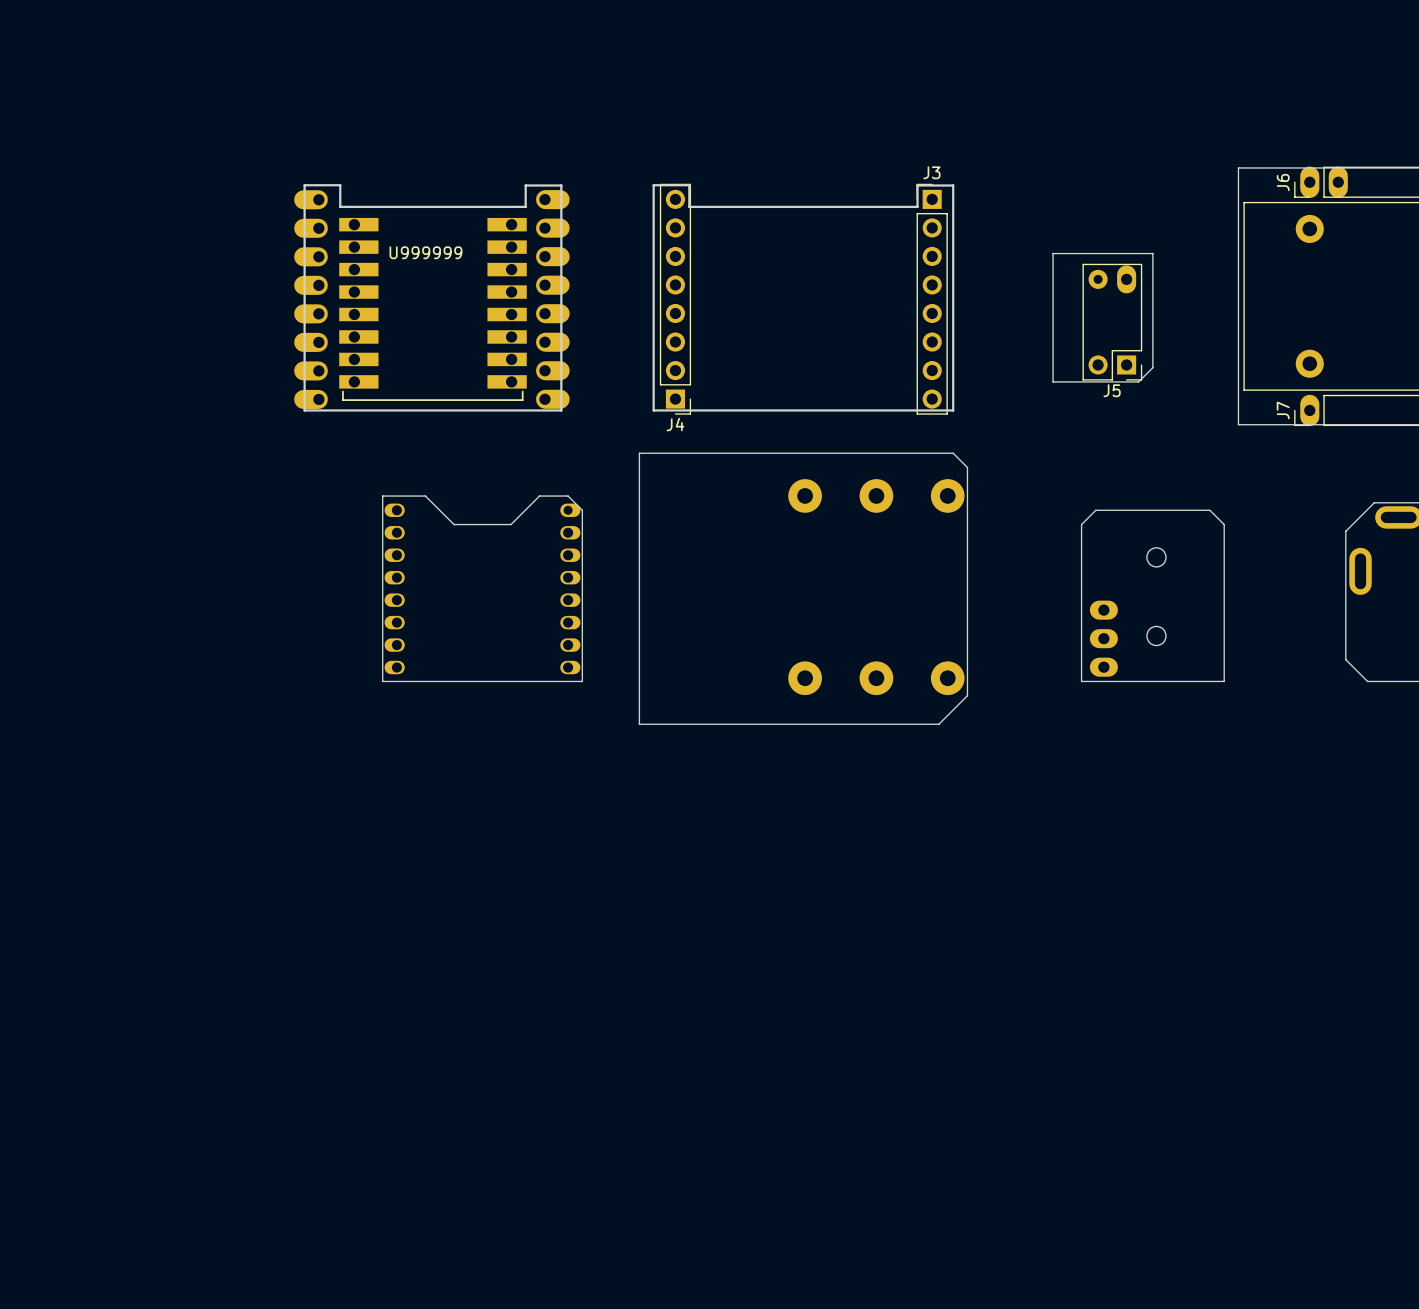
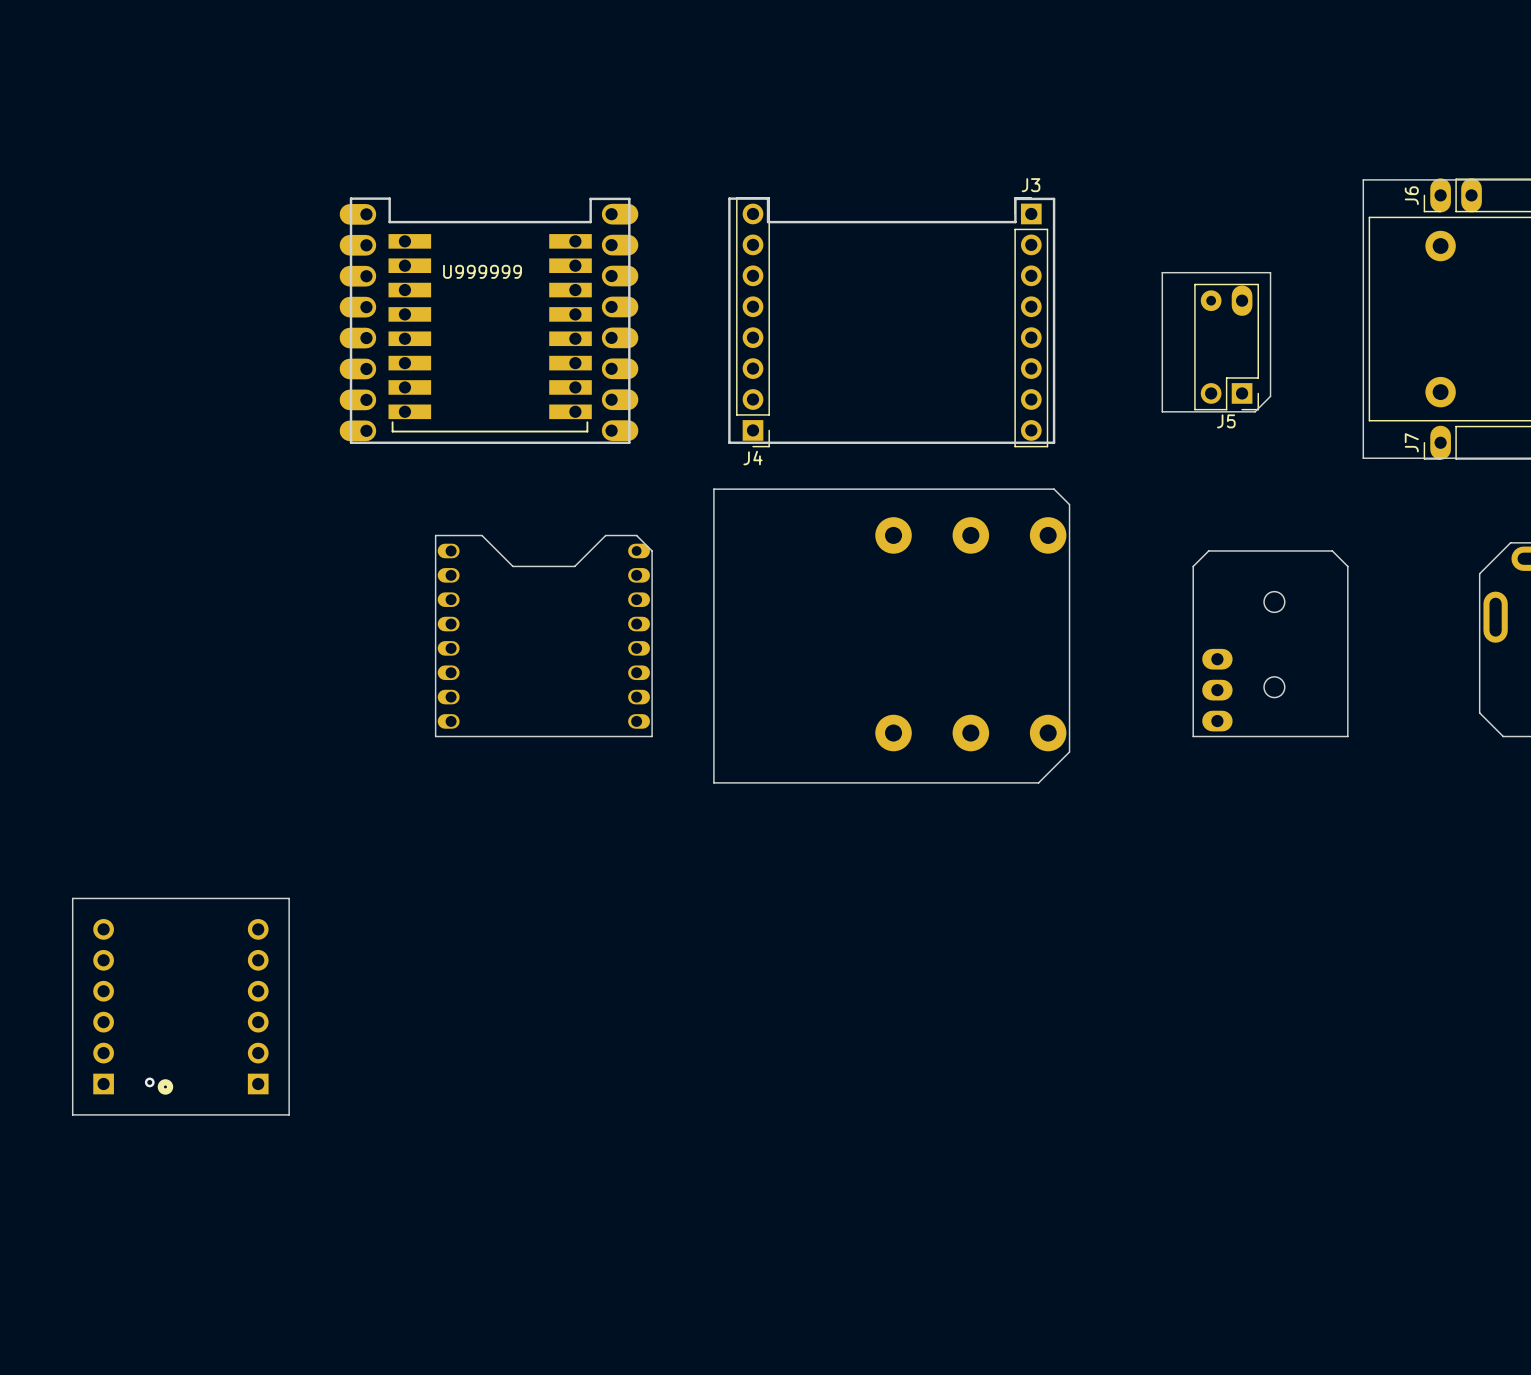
board edge: none -> (72, 898) (289, 898) (289, 1114) (72, 1114) (72, 898)
part: none -> (103, 1006)
part: none -> (258, 1006)
via: none -> (149, 1082)
part: none -> (165, 1086)

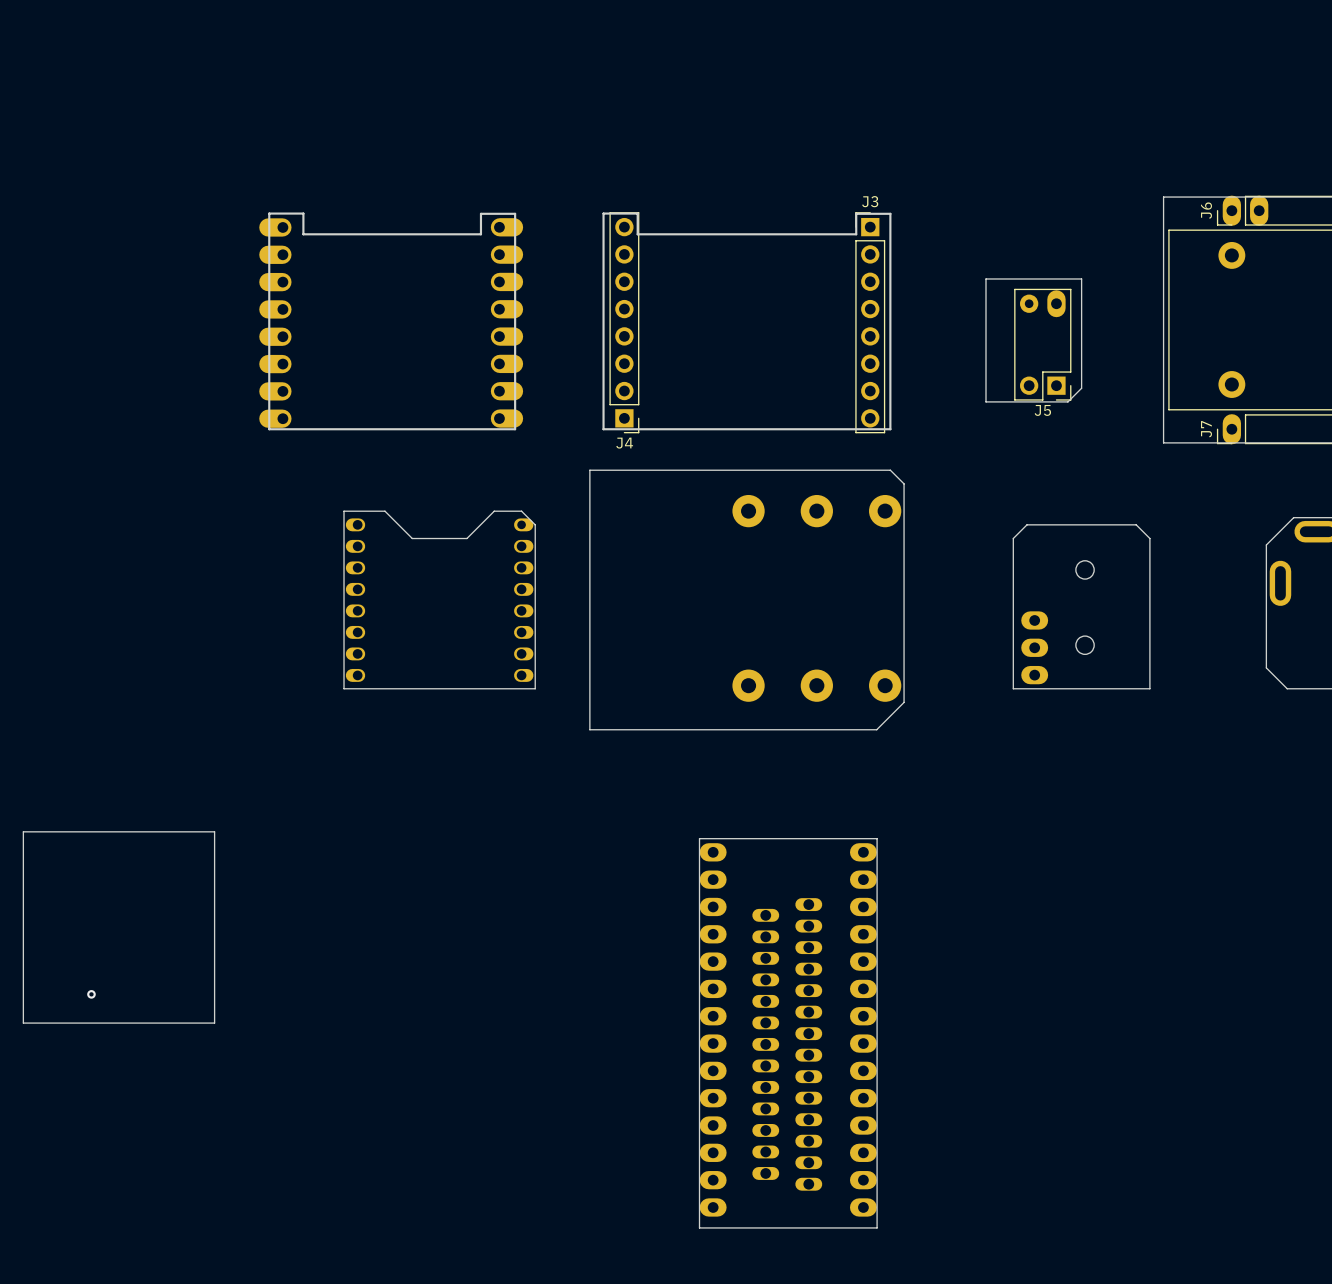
U999999: (490, 333) -> none
board edge: none -> (699, 838) (877, 838) (877, 1227) (699, 1227) (699, 838)
part: (103, 1006) -> none
part: (258, 1006) -> none
part: (165, 1086) -> none
part: none -> (713, 1029)
part: none -> (863, 1029)
part: none -> (787, 1044)

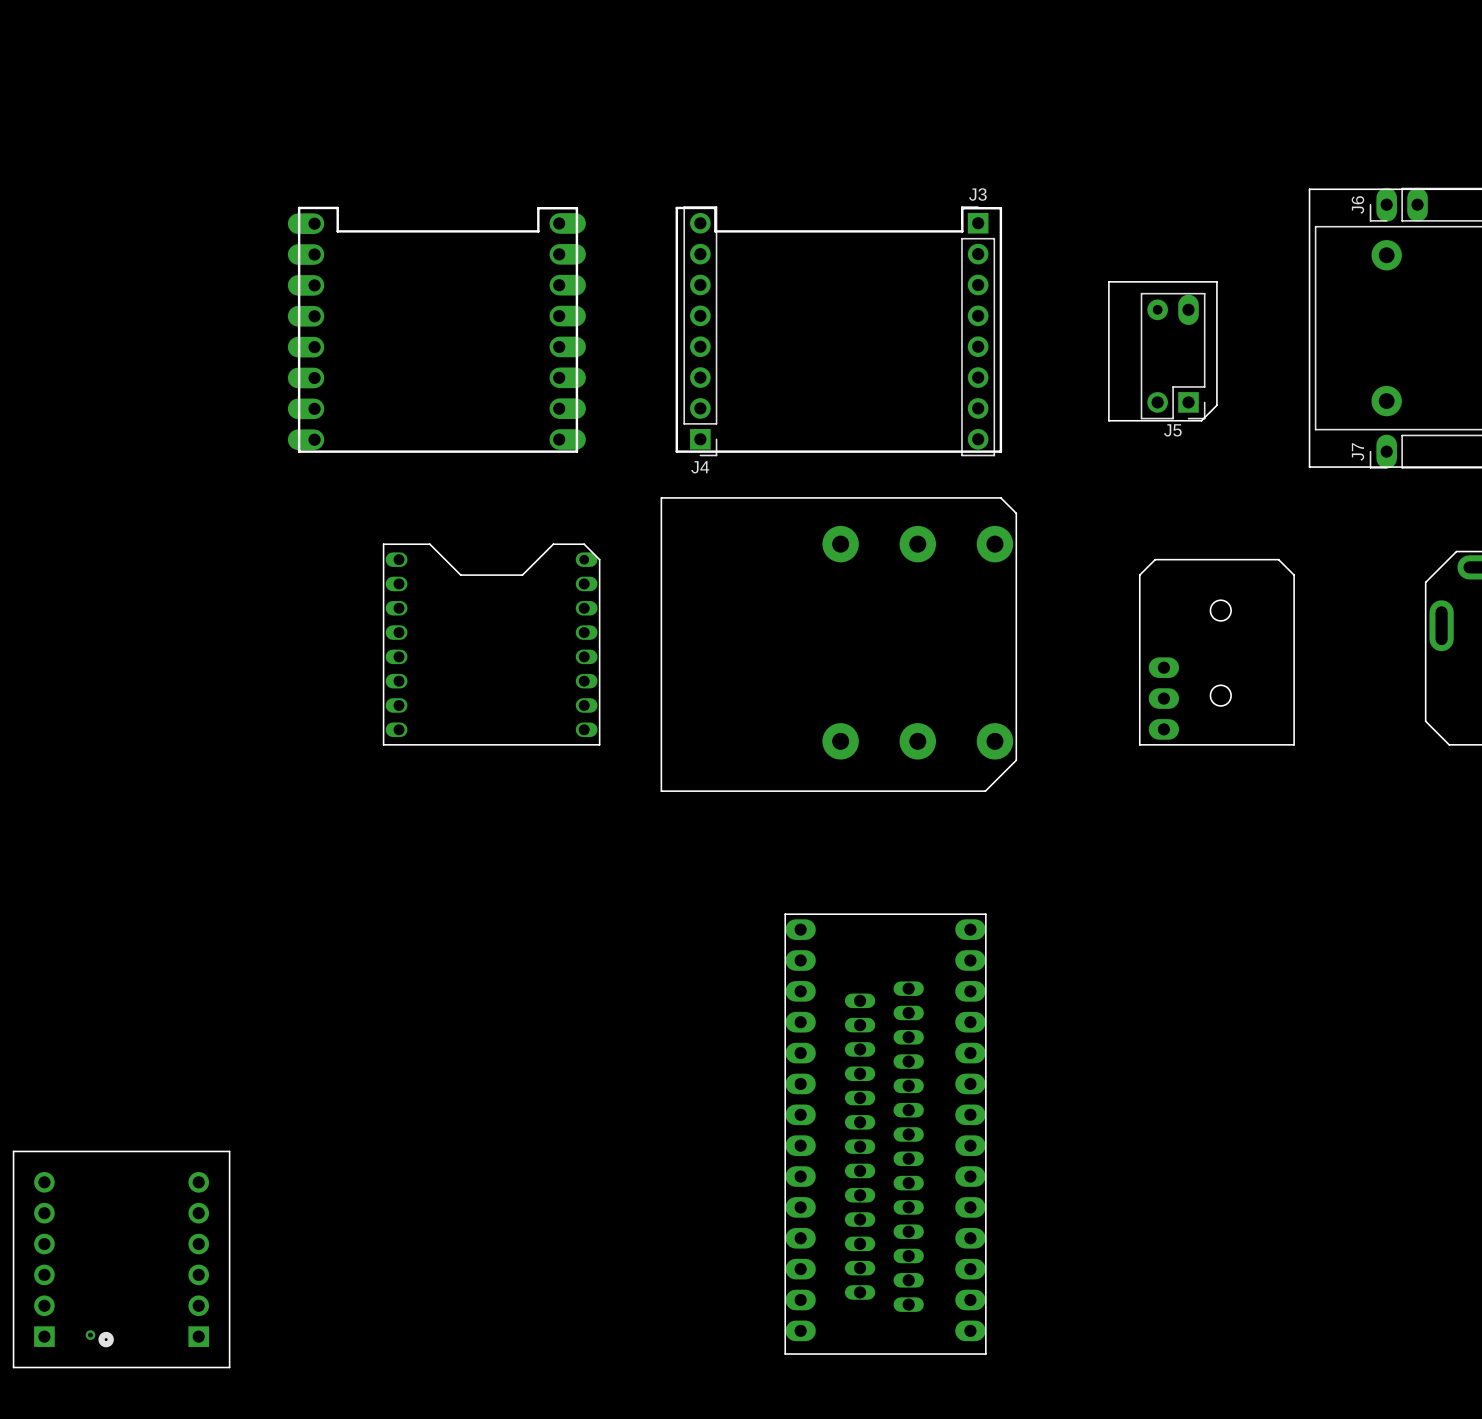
board edge: (23, 831) (214, 831) (214, 1023) (23, 1023) (23, 831) -> (13, 1151) (229, 1151) (229, 1367) (13, 1367) (13, 1151)
via: (91, 994) -> none
part: none -> (44, 1259)
part: none -> (198, 1259)
via: none -> (90, 1335)
part: none -> (106, 1339)

